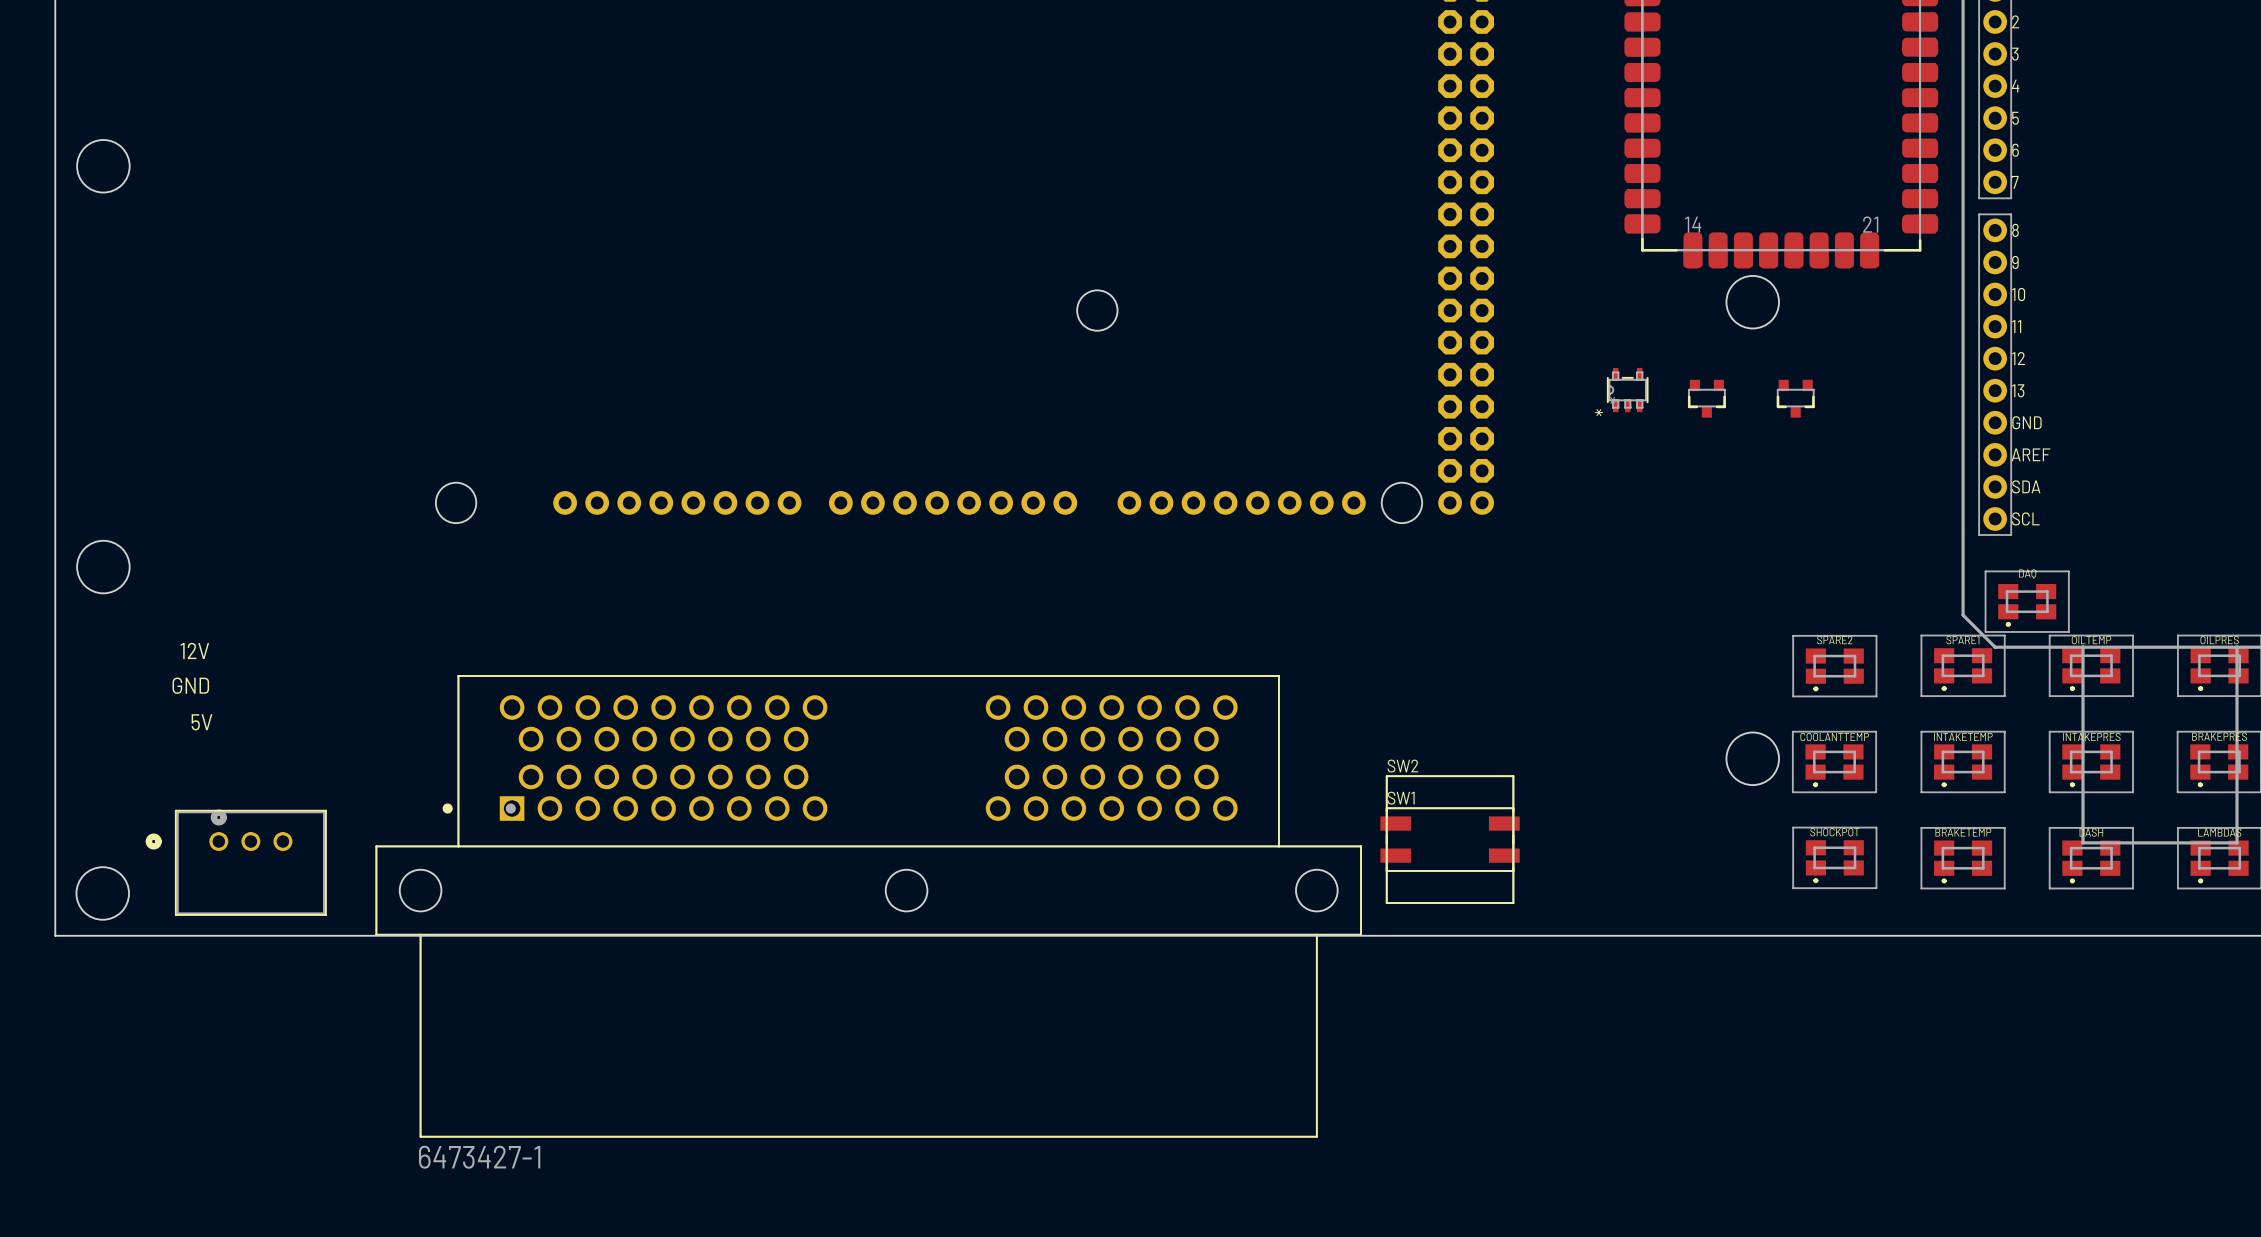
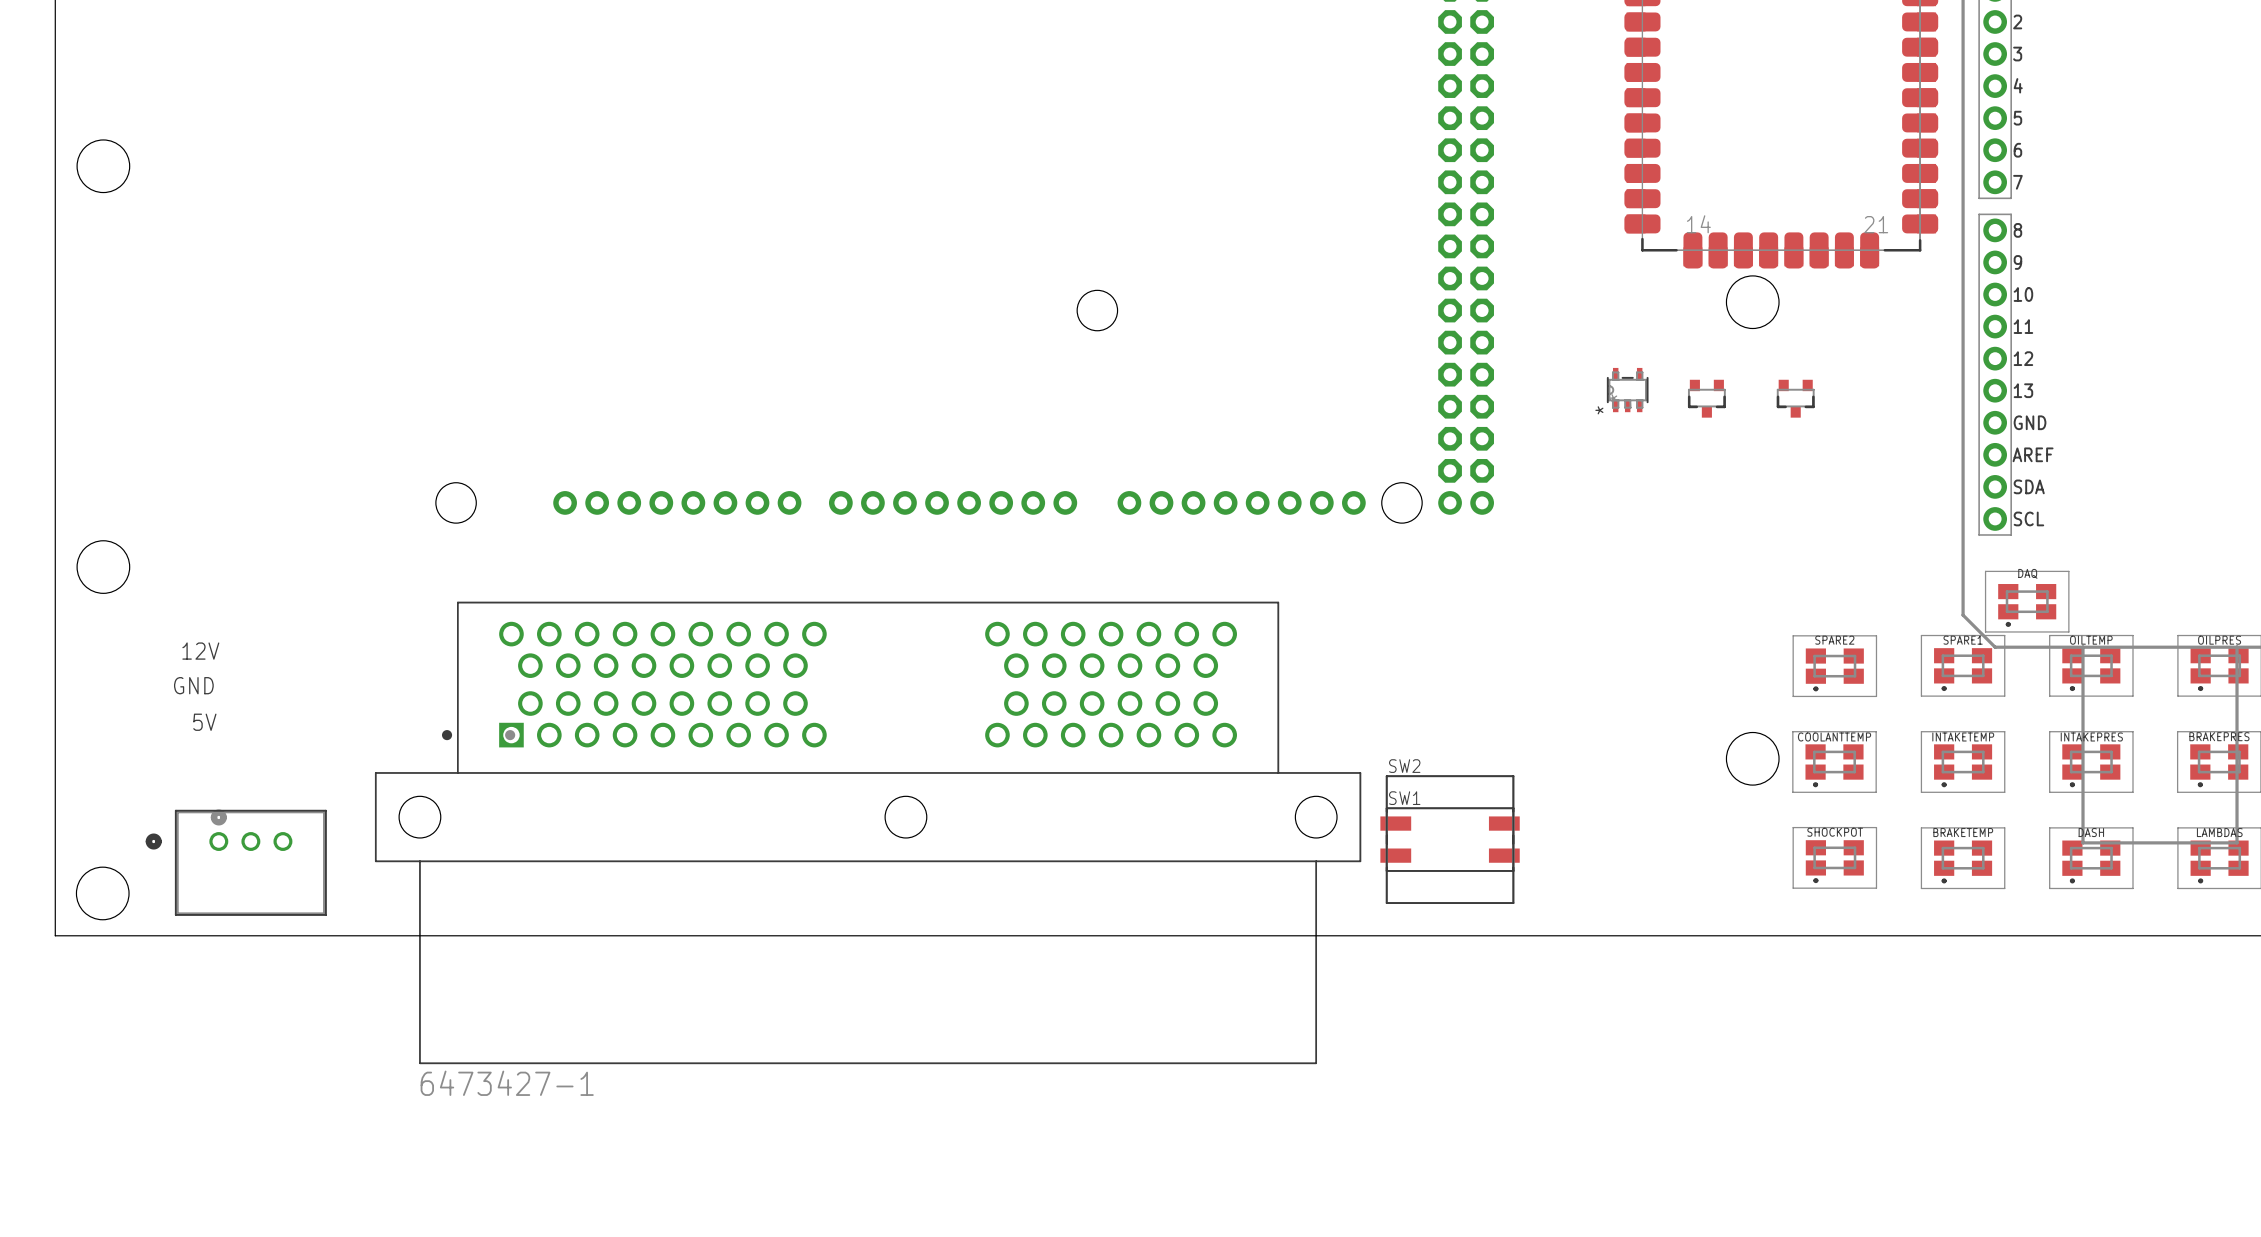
part position: (868, 906) -> (868, 832)

